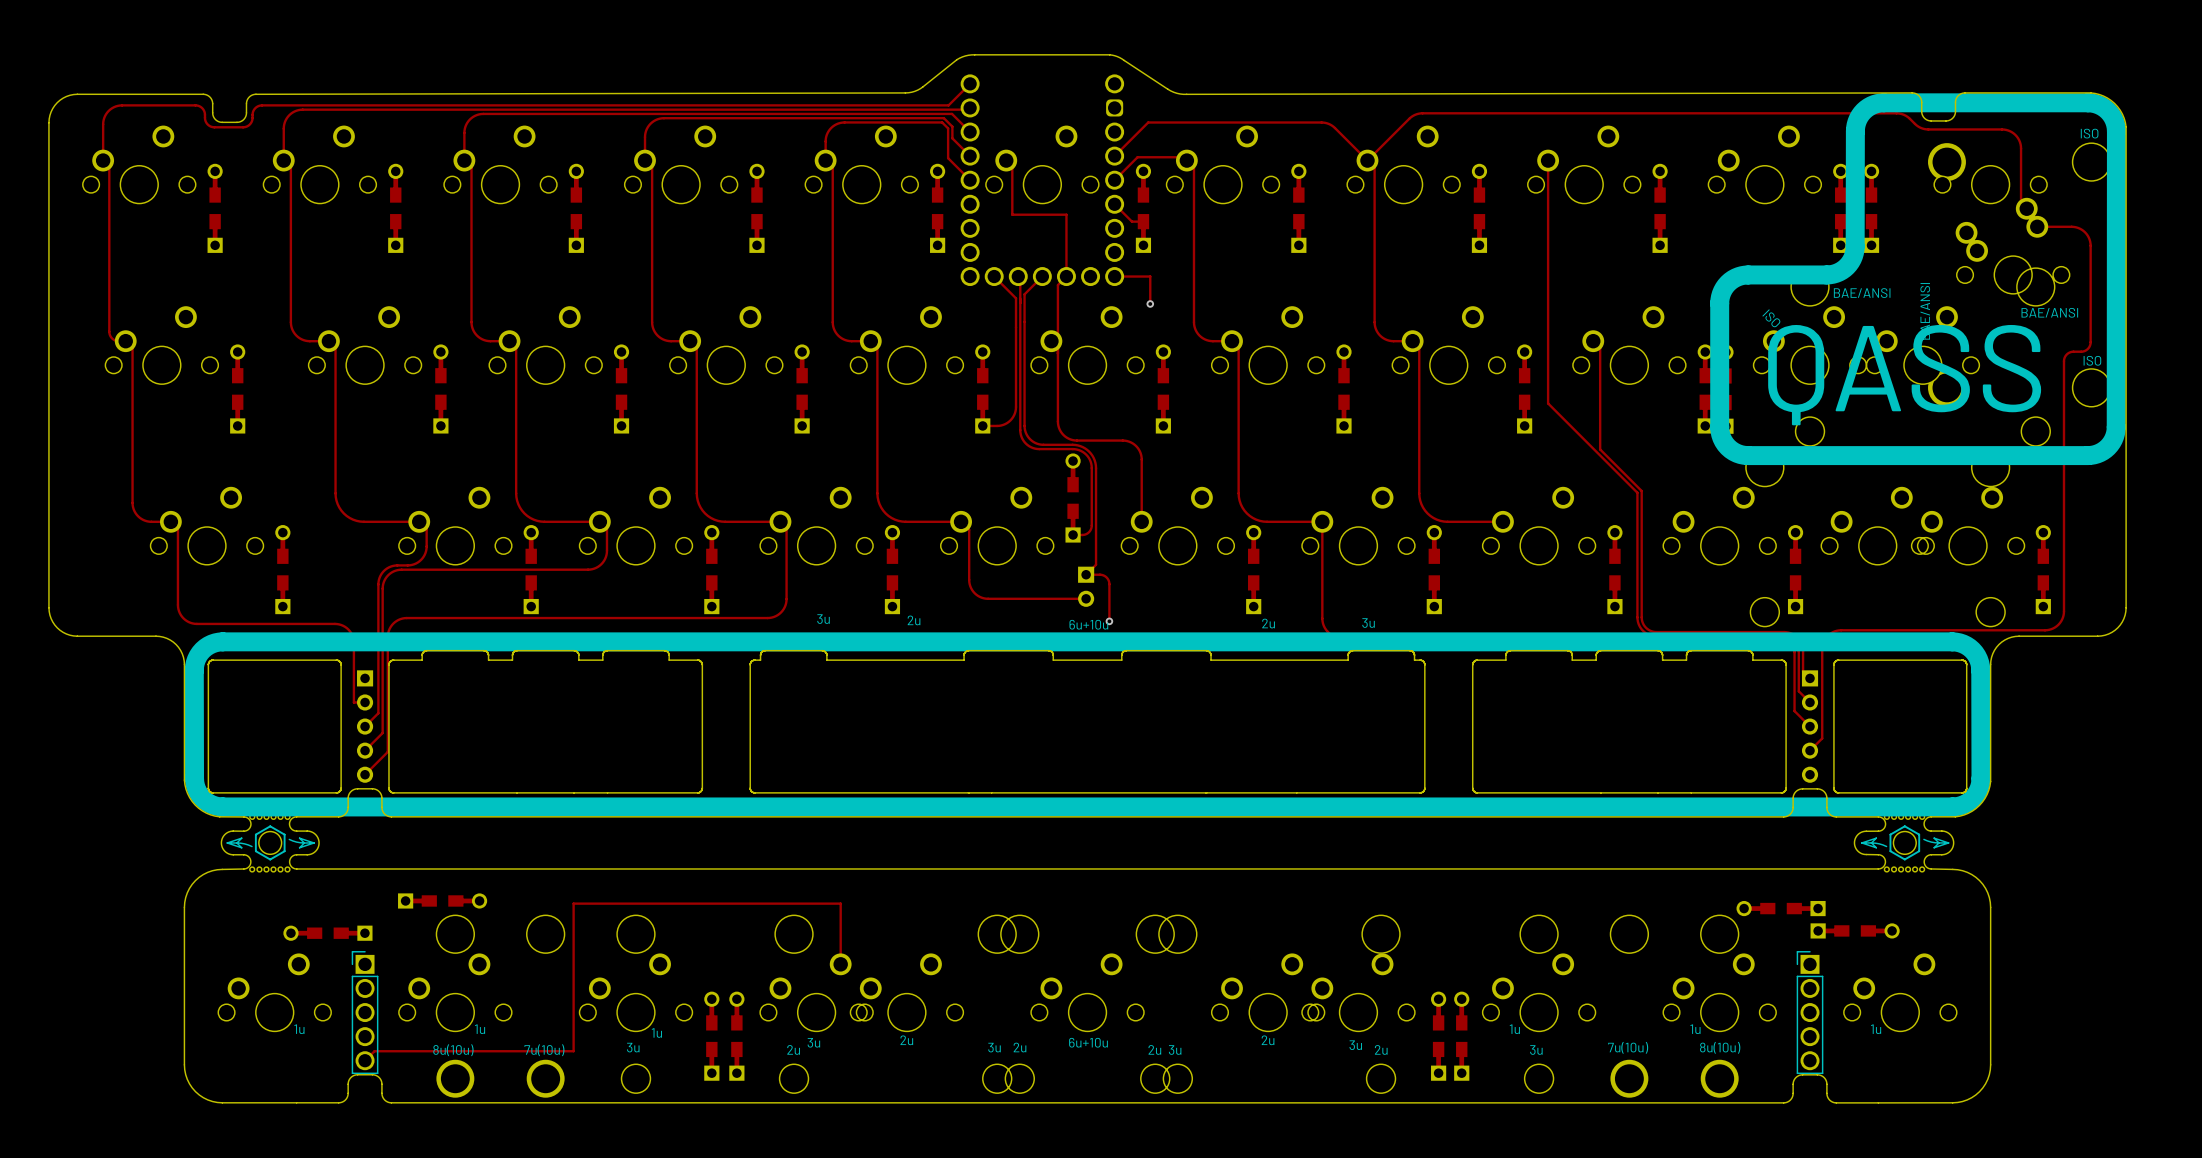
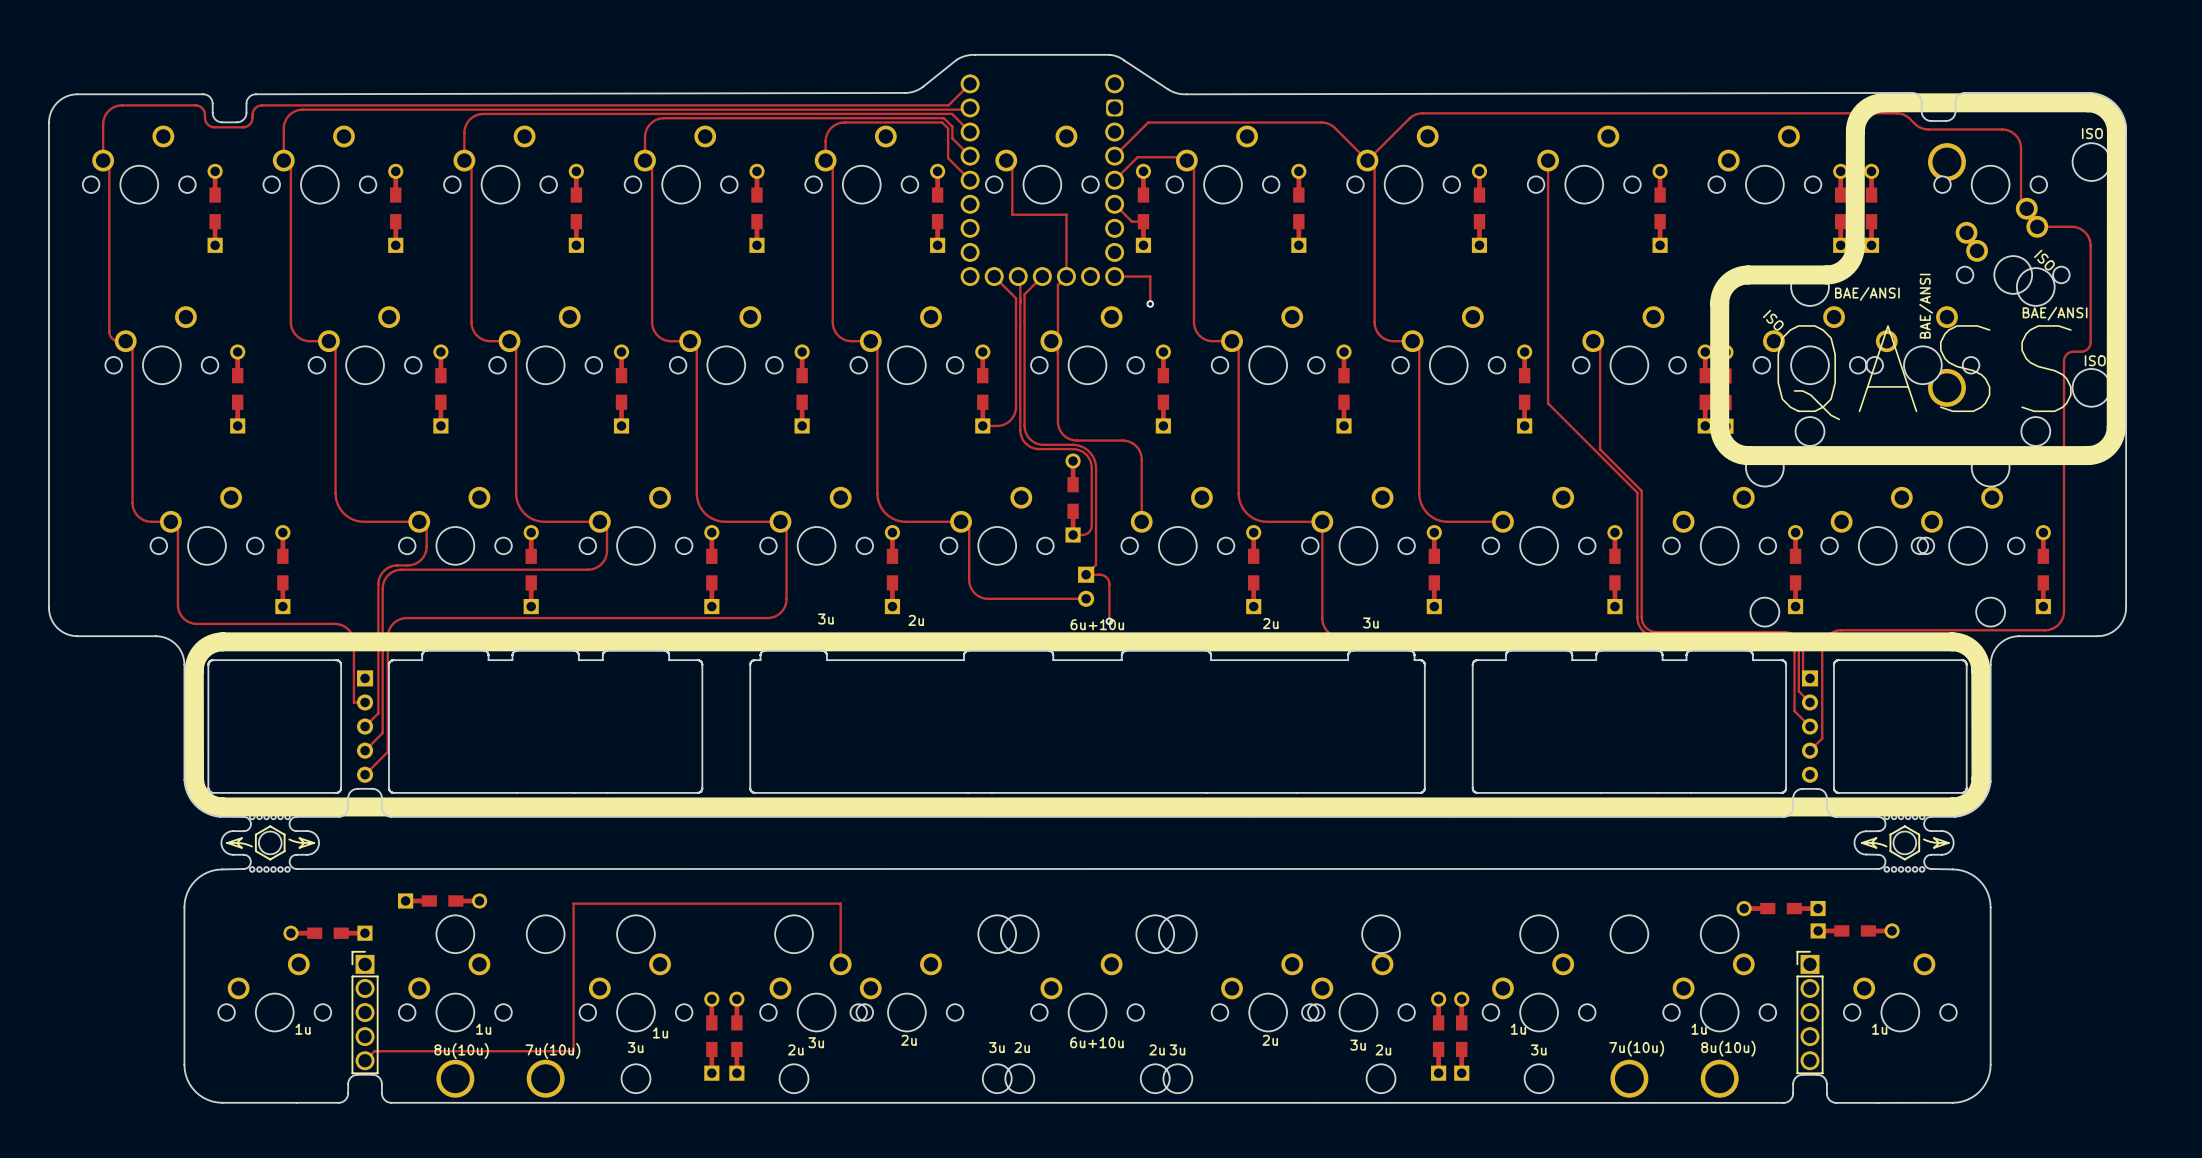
text: none -> ISO (2044, 260)

